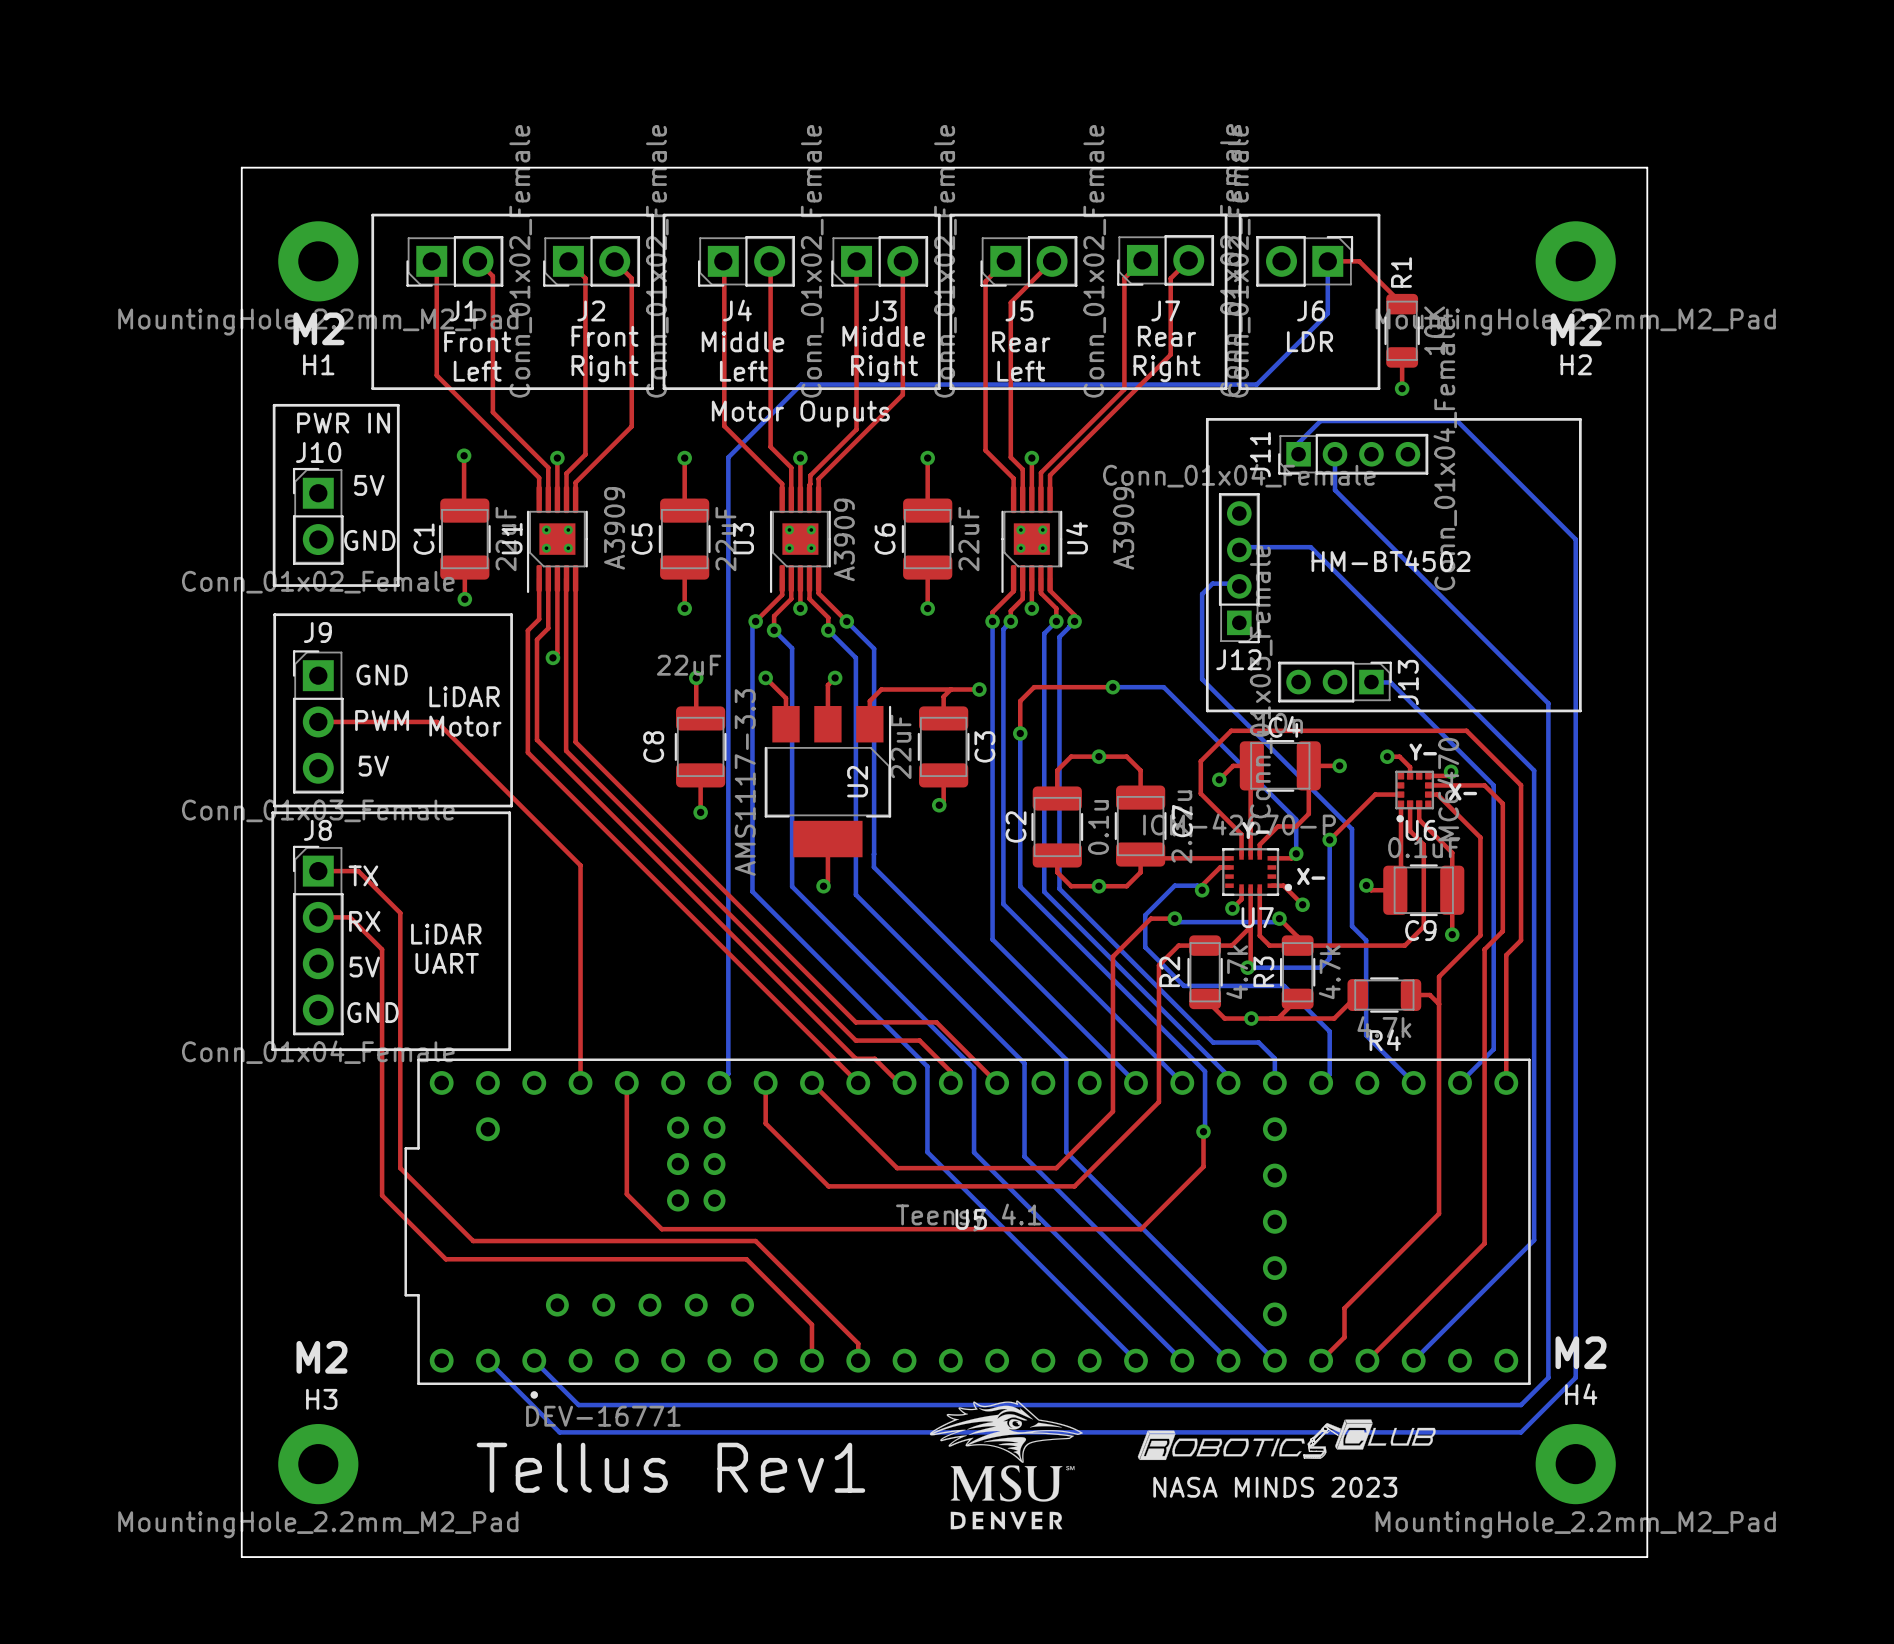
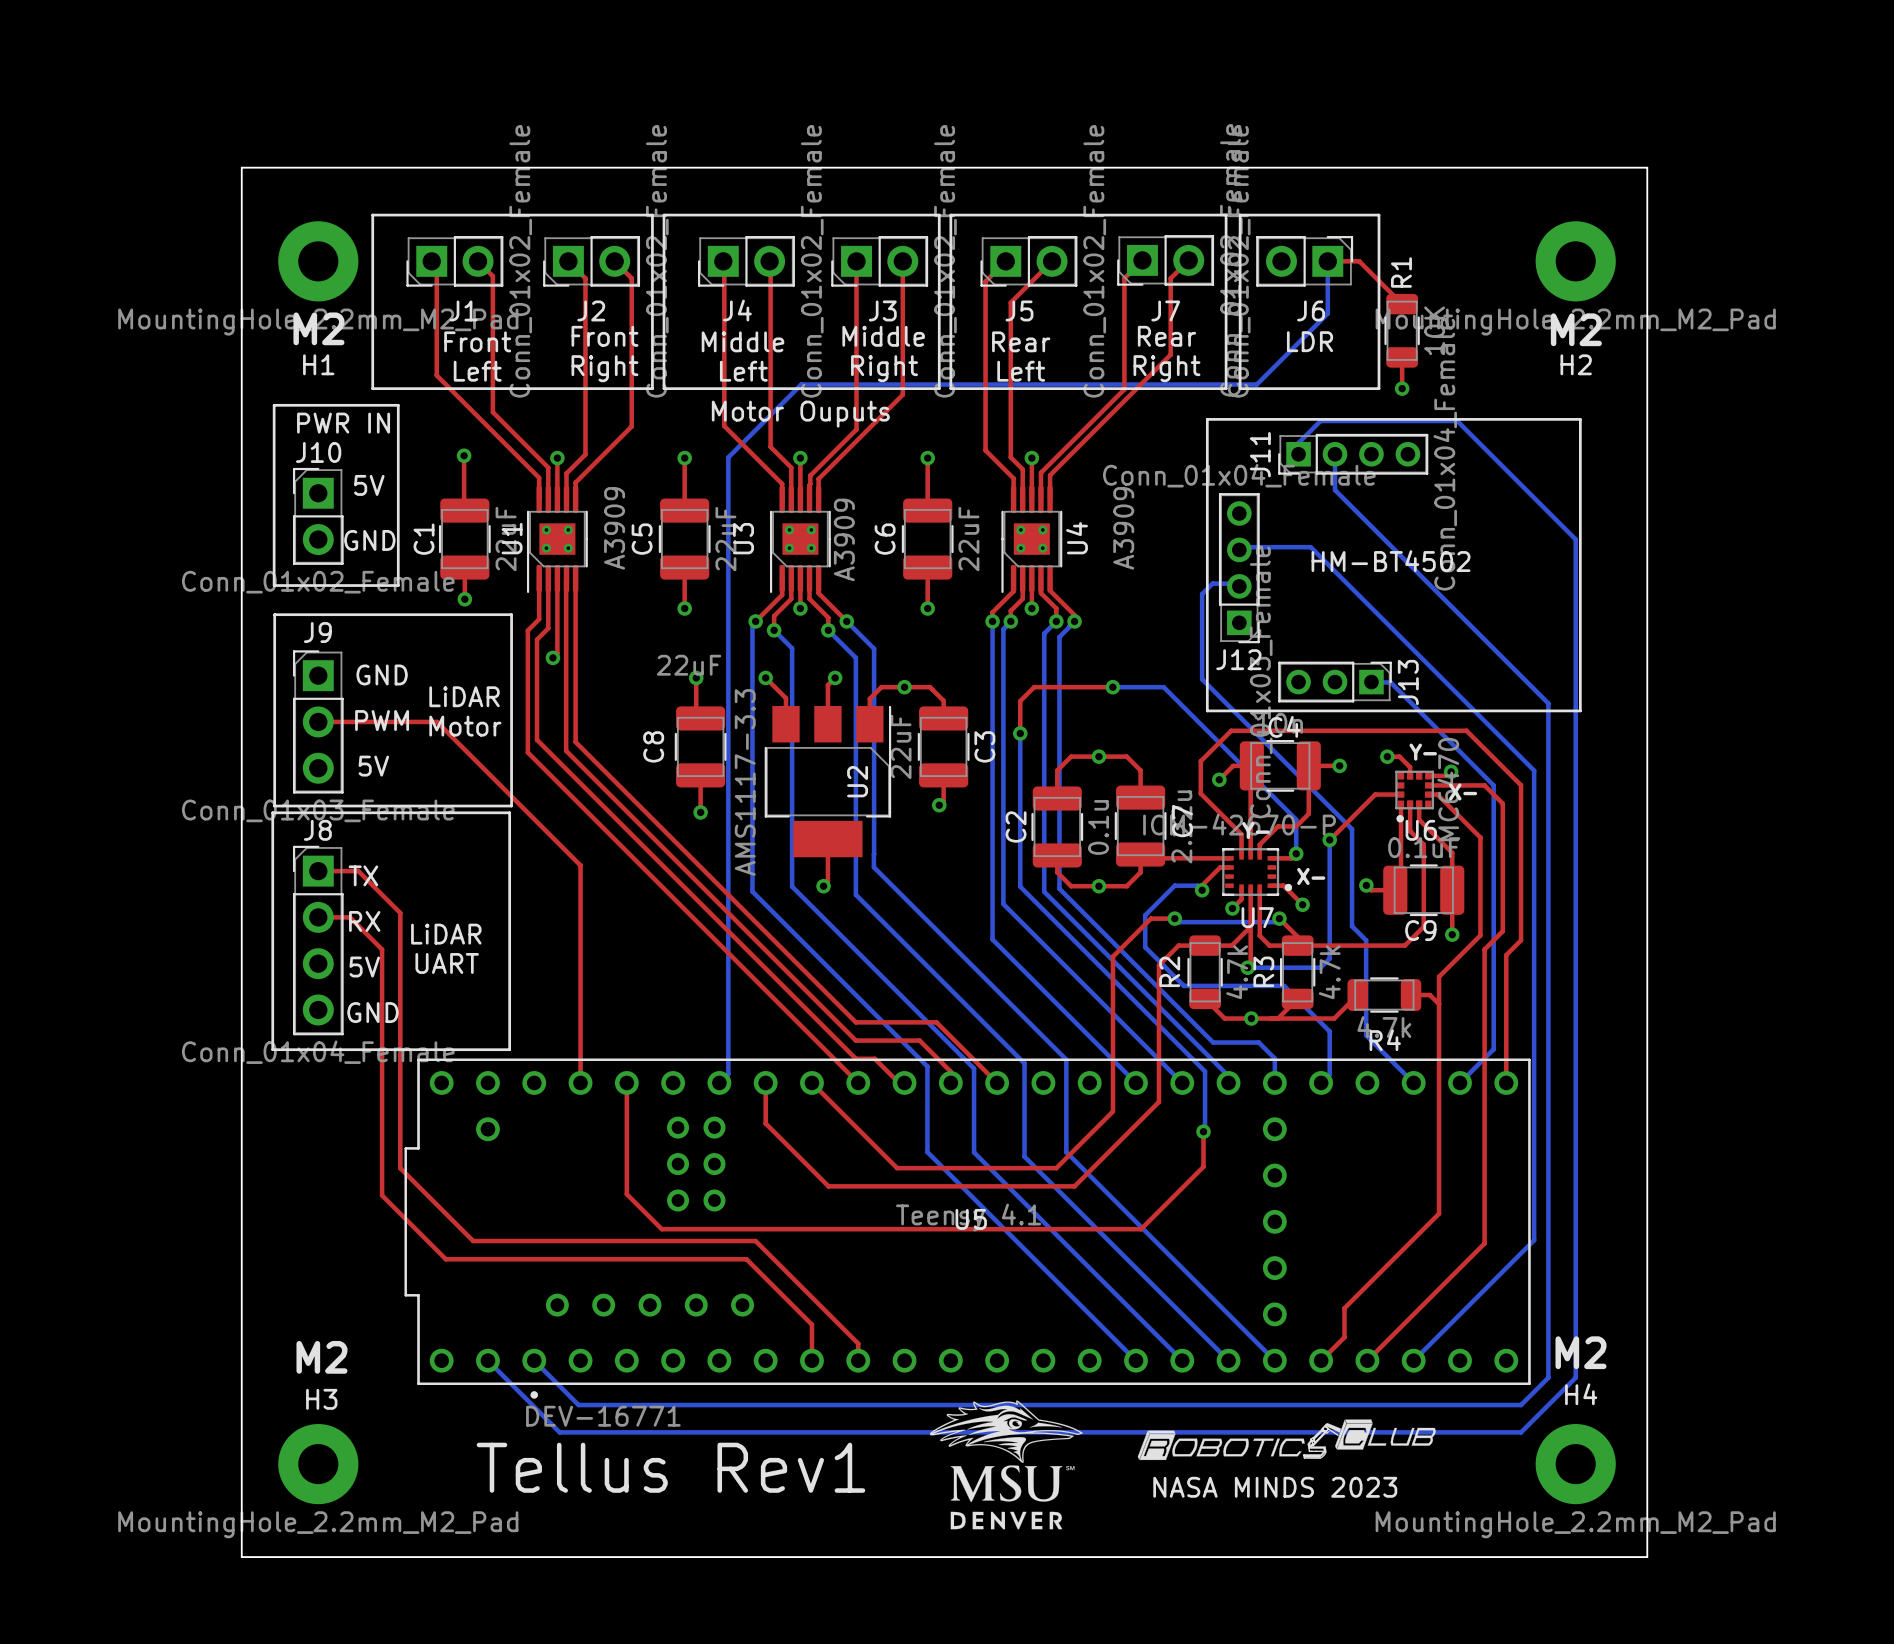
top track: (950, 689) (943, 696) (943, 700) -> none
top track: (979, 689) (881, 689) (869, 701) -> (943, 700) (930, 687) (881, 687) (869, 701)
via position: (979, 689) -> (904, 687)

